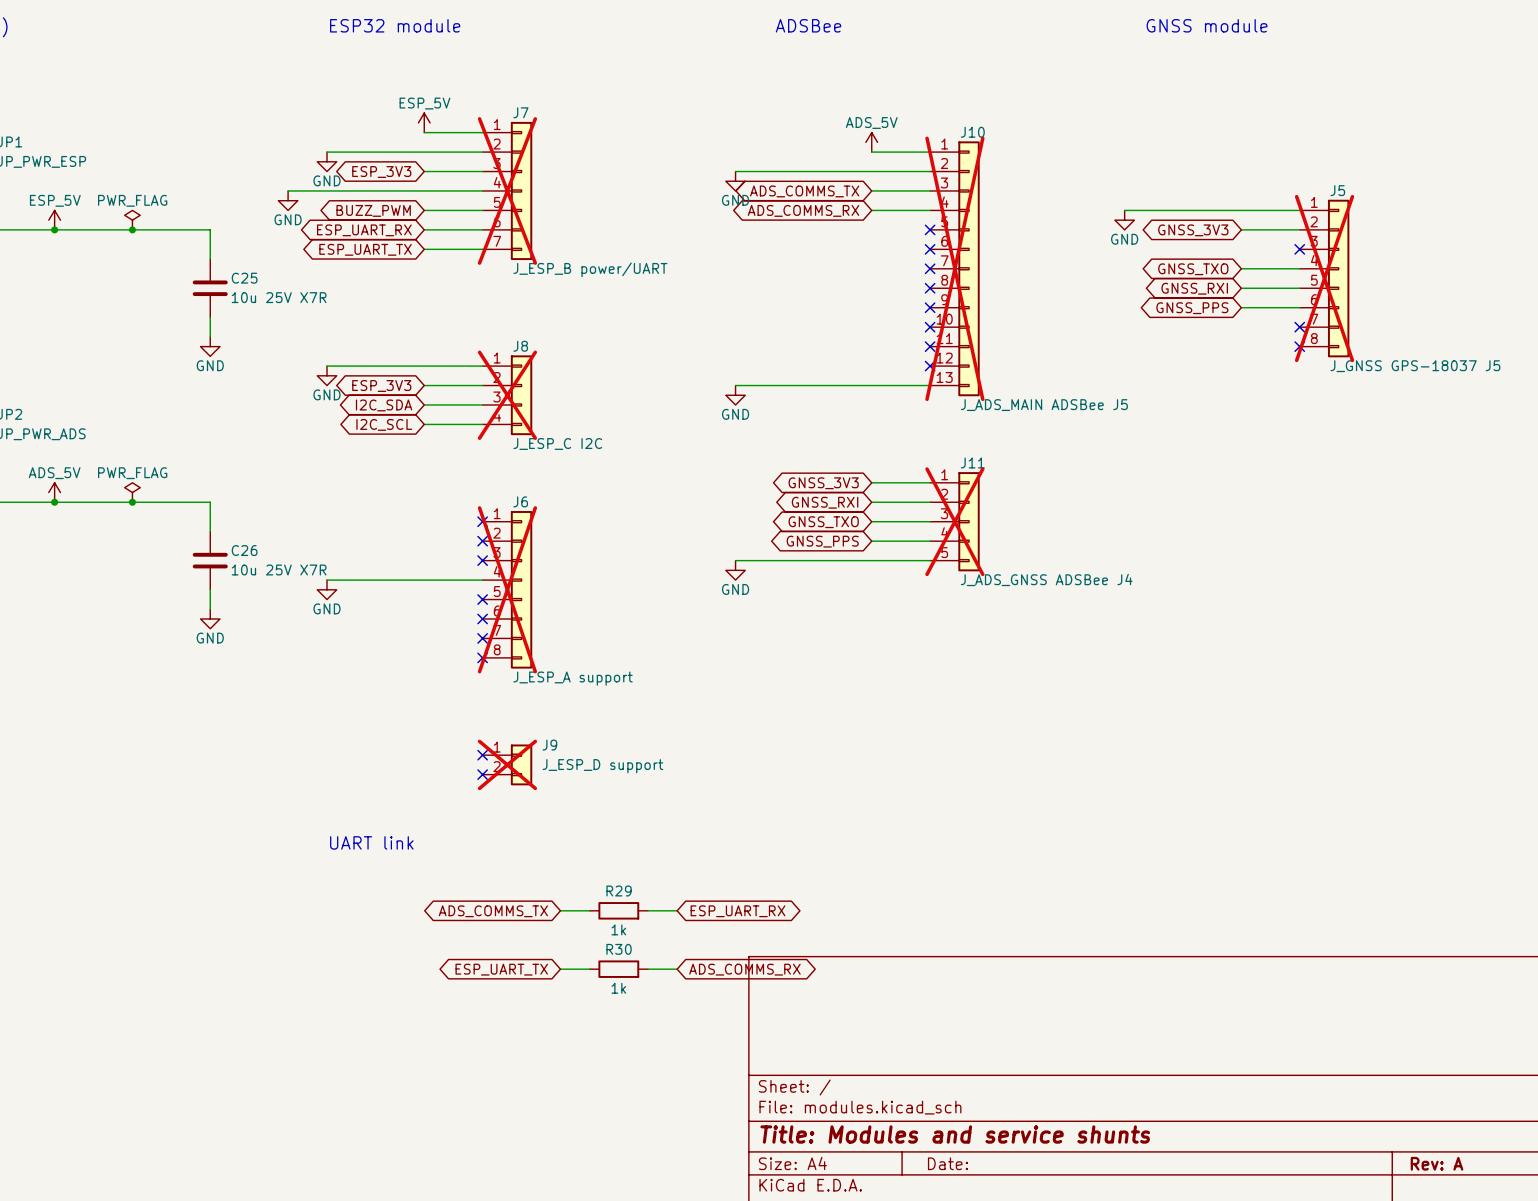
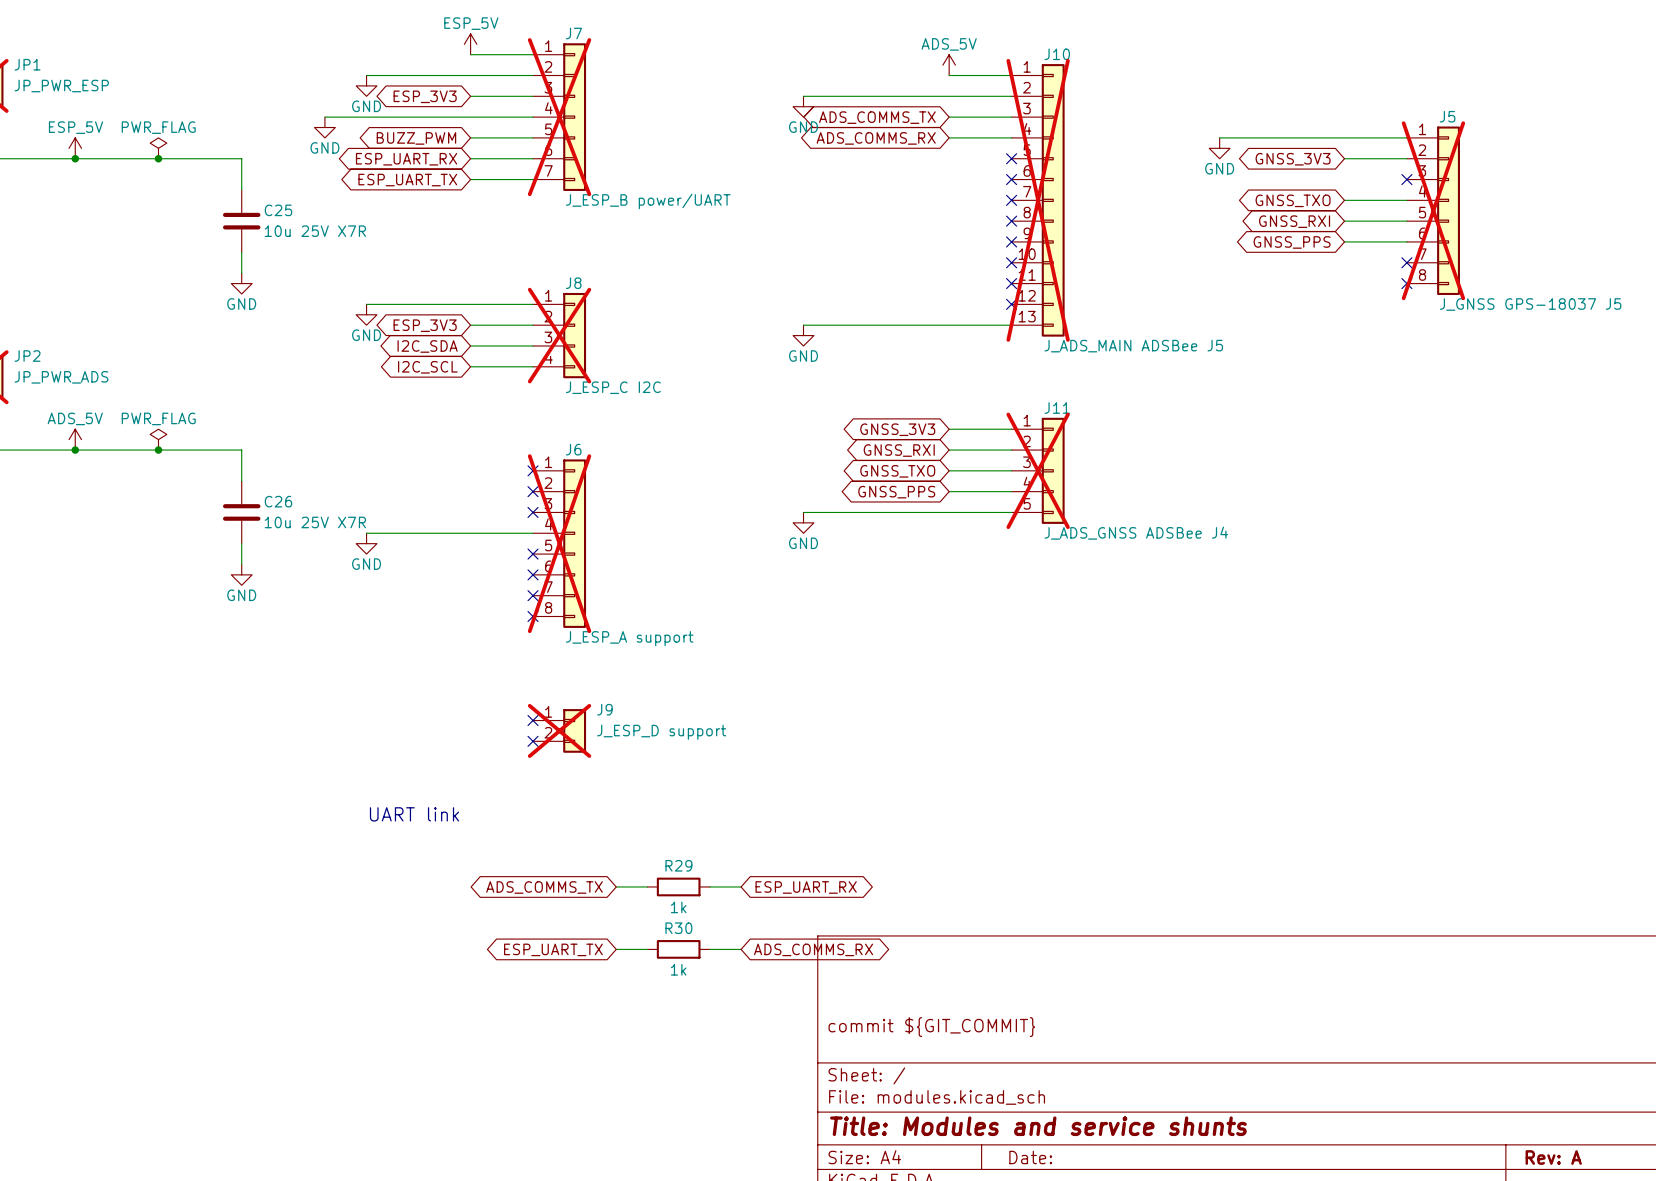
title block: none -> commit ${GIT_COMMIT} (931, 1027)

